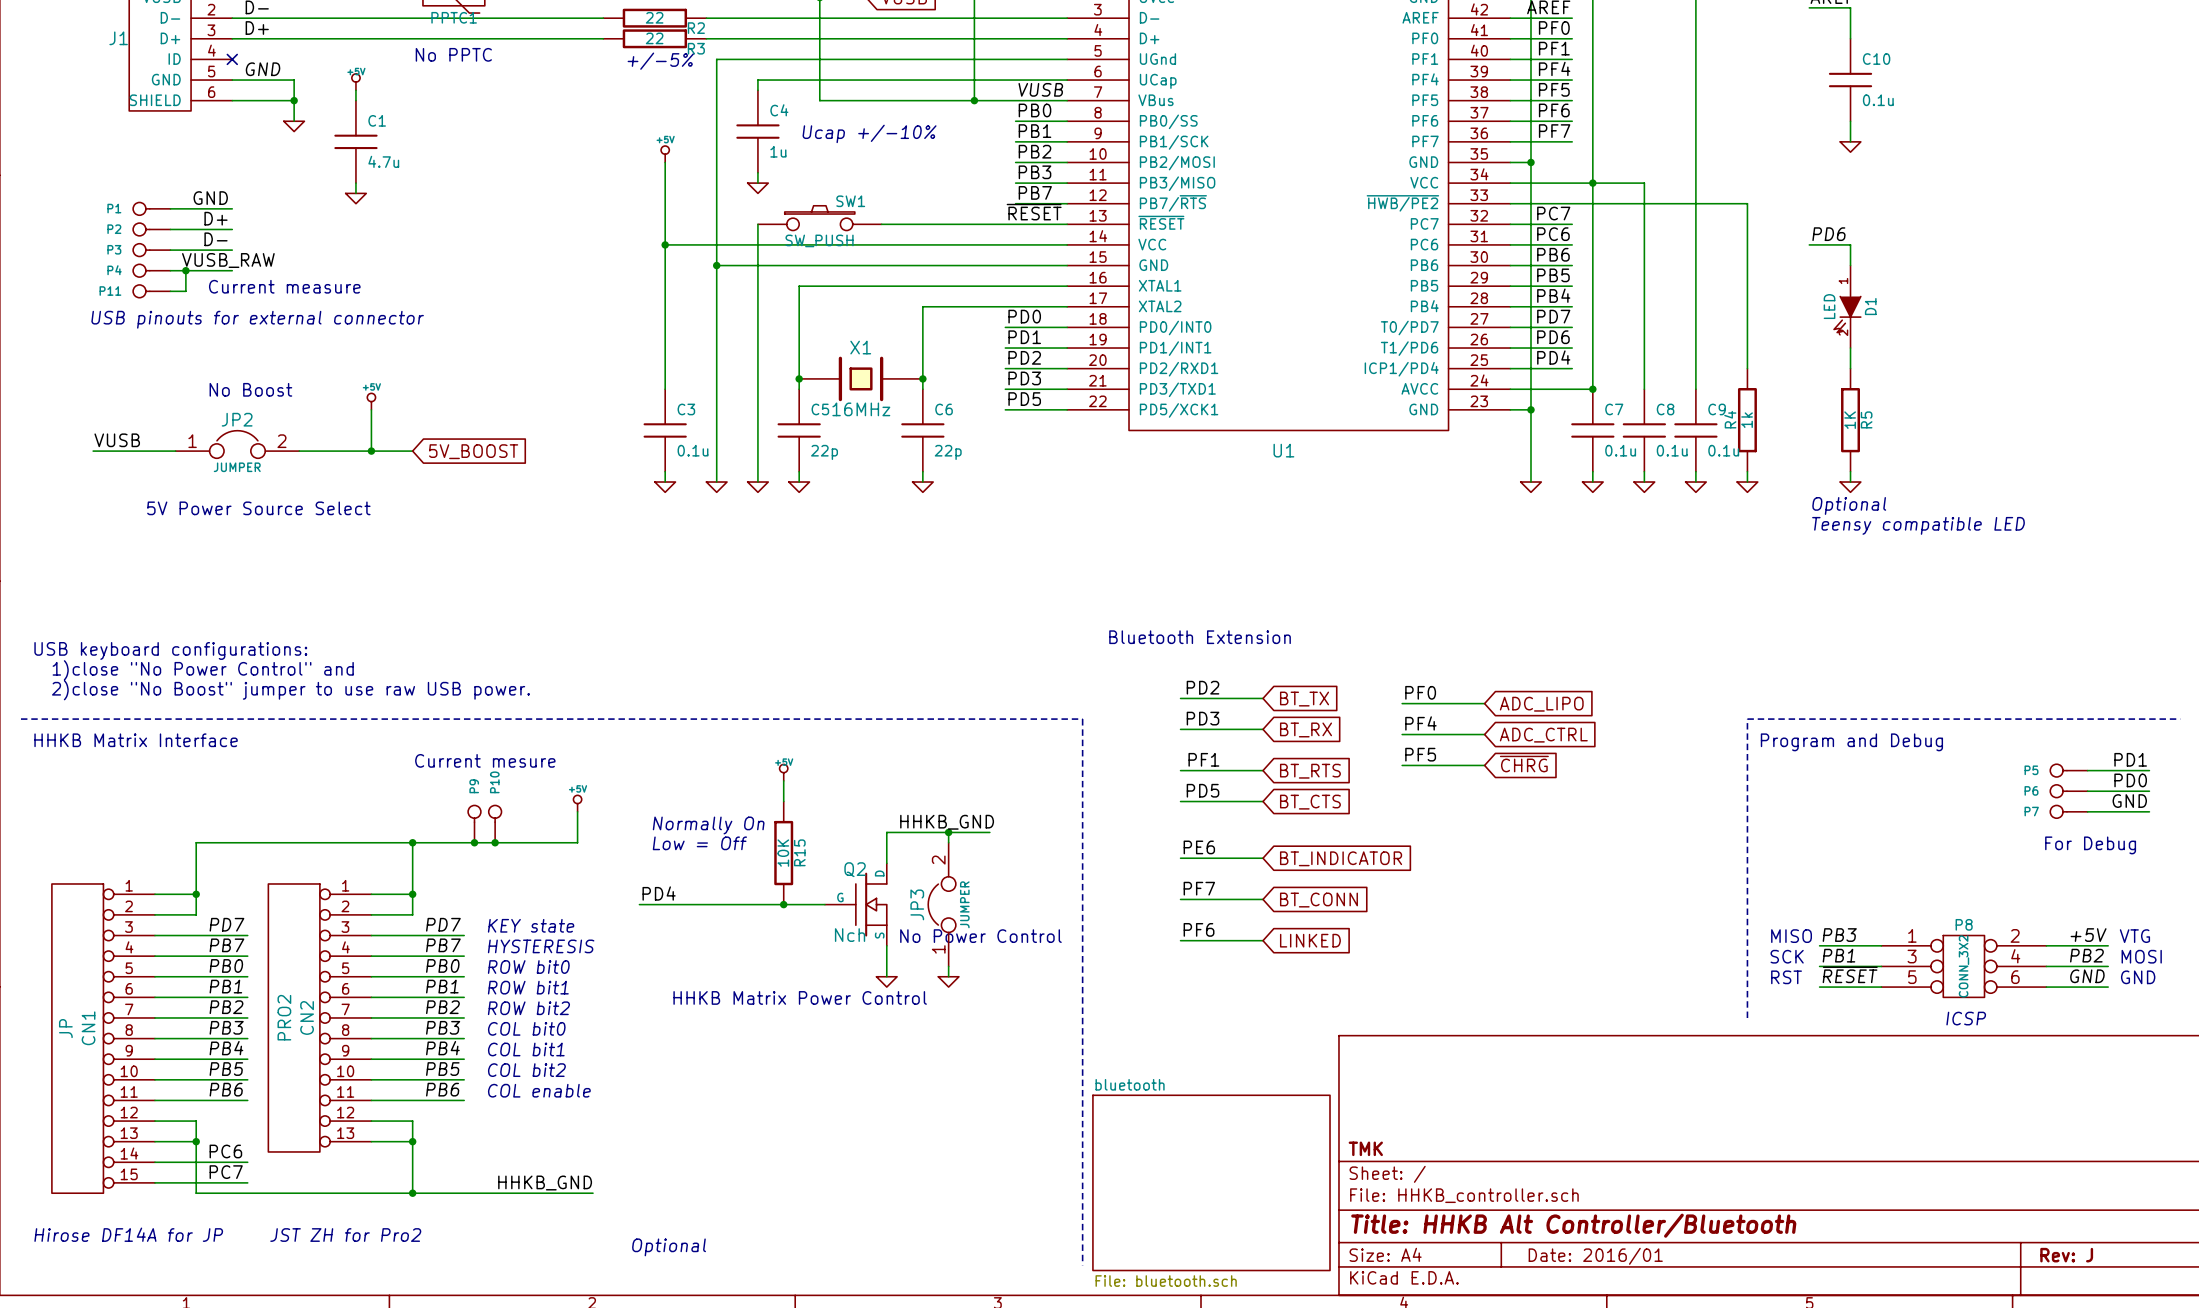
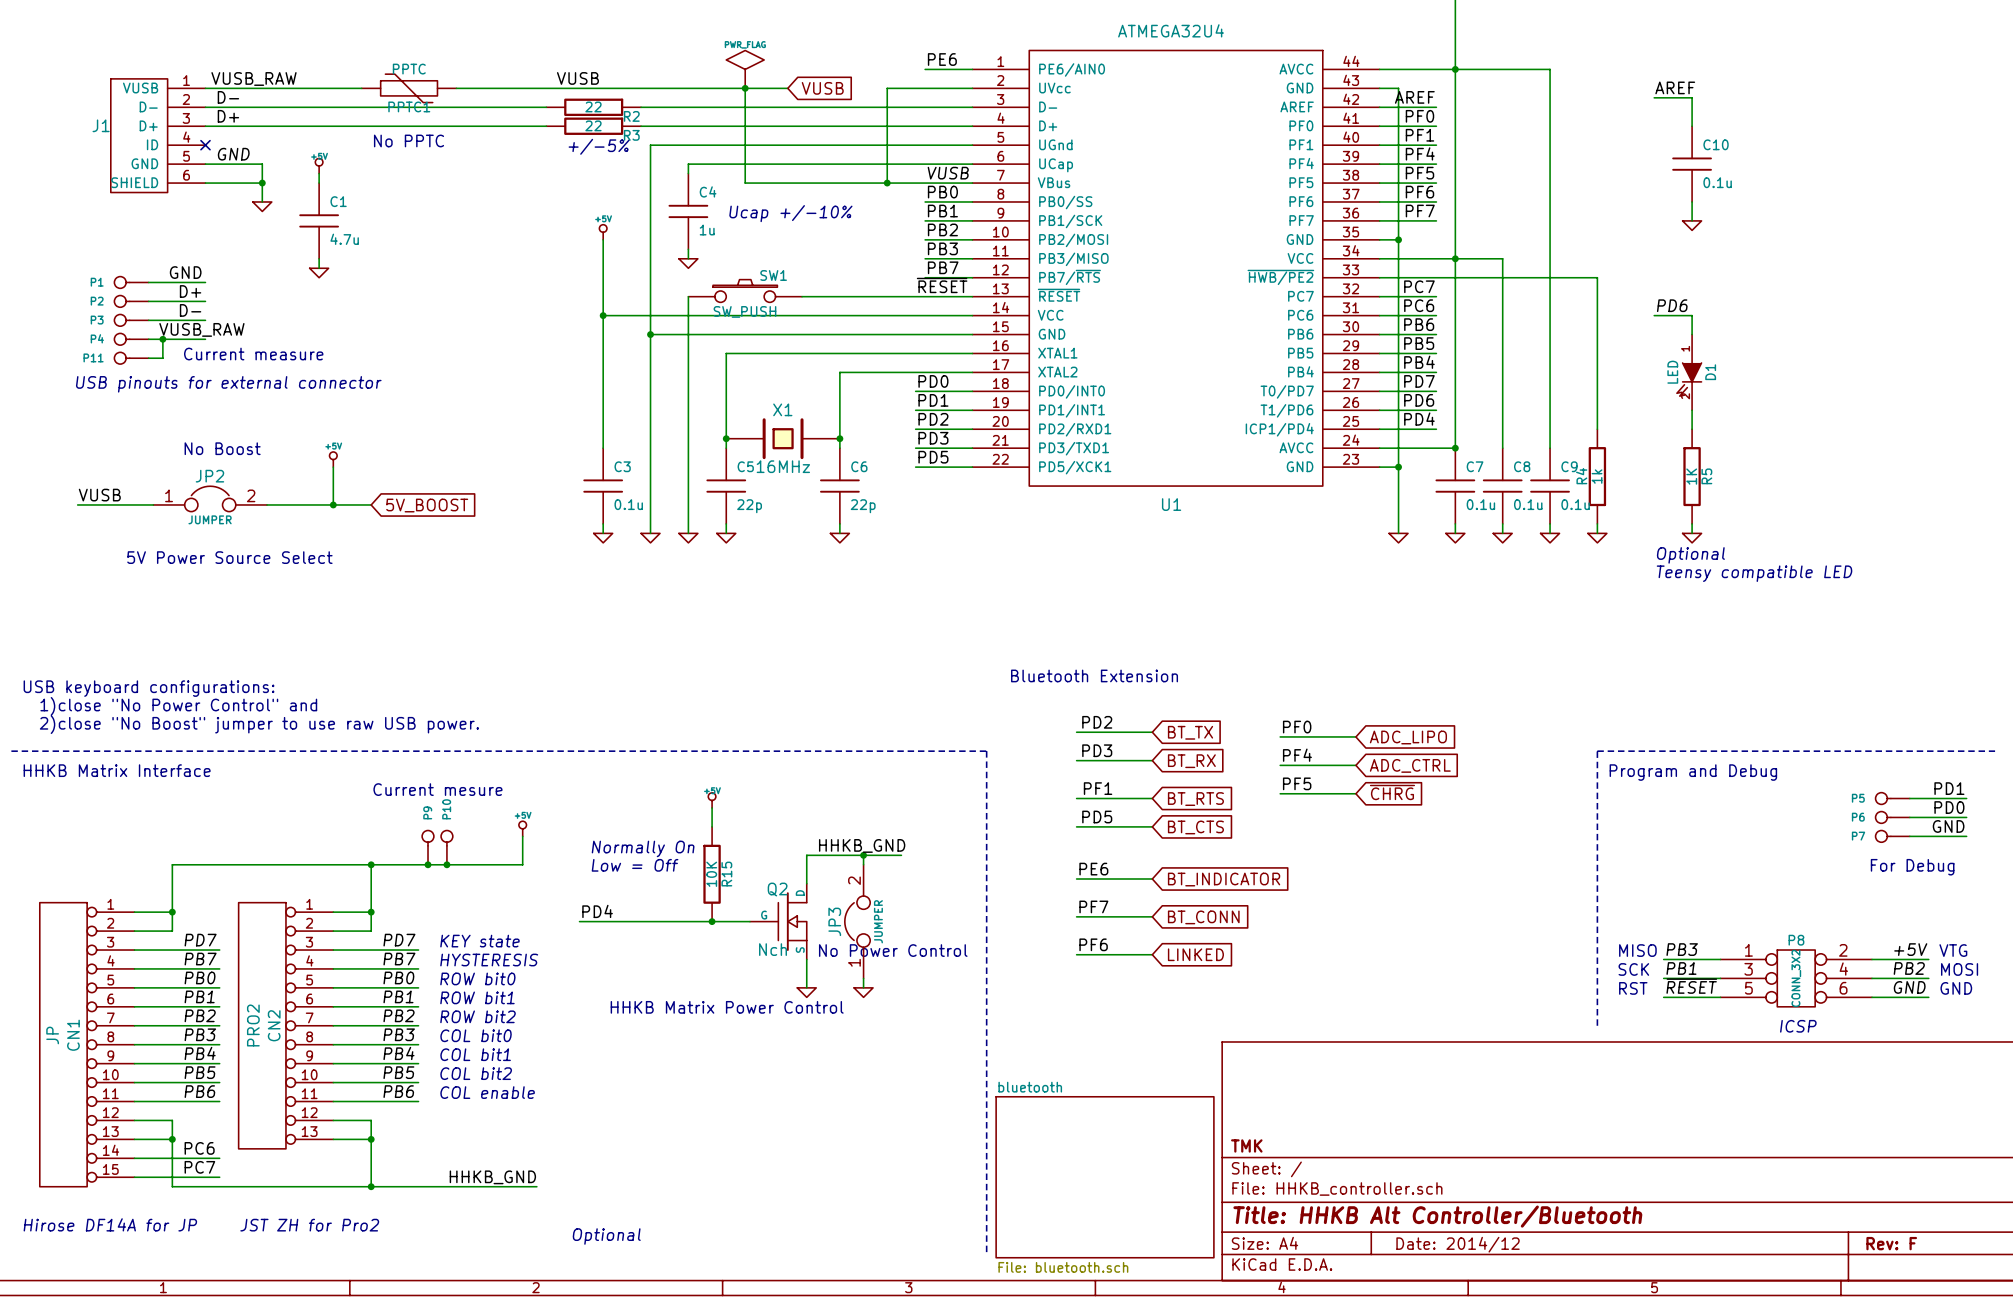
title block: Rev: J (2066, 1255) -> Rev: F (1891, 1243)
title block: Date: 2016/01 (1595, 1256) -> Date: 2014/12 (1458, 1244)

